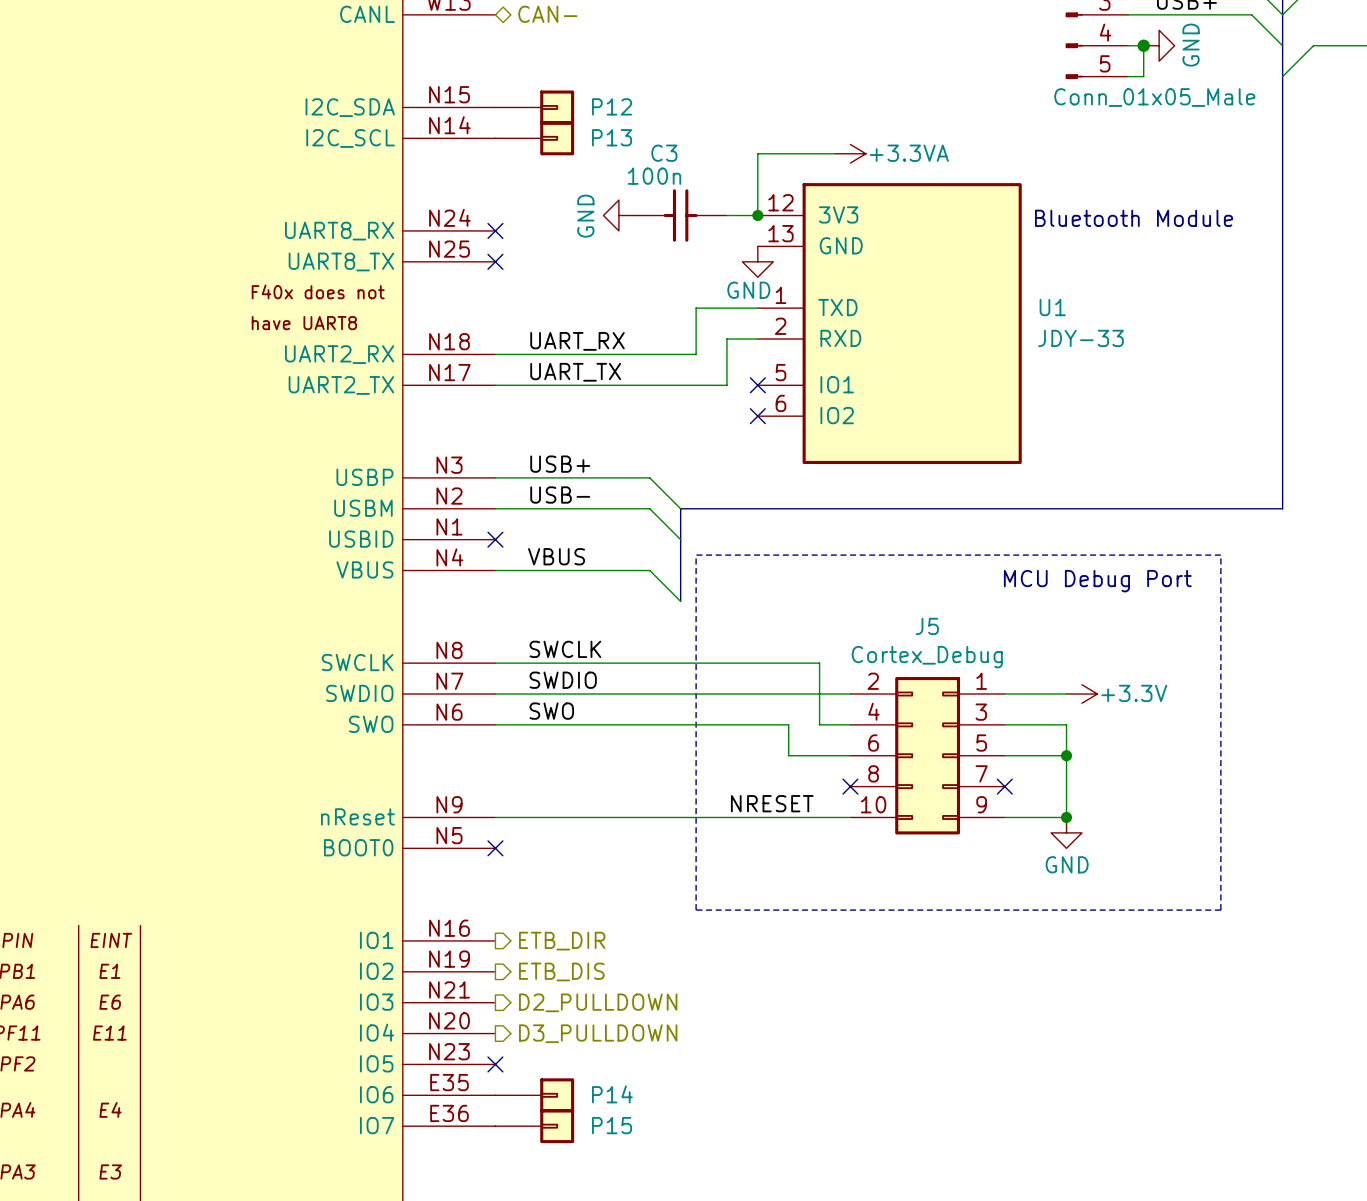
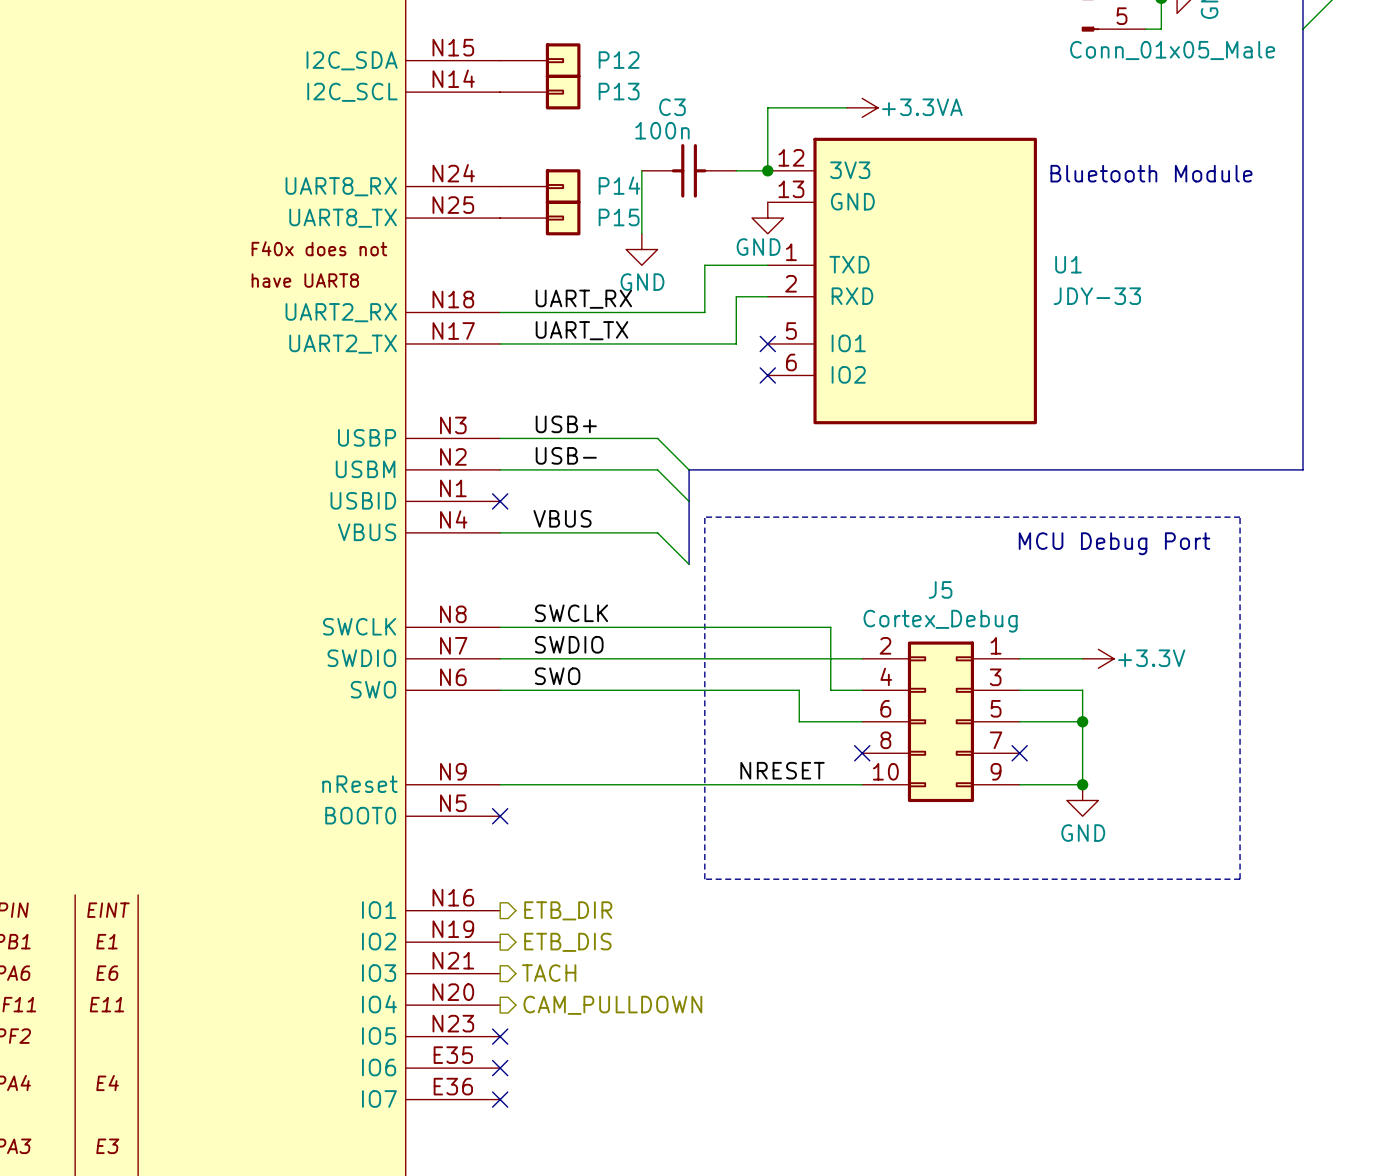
power symbol rotation: 0° (618, 215) -> 90° counterclockwise (641, 249)
power symbol position: GND (618, 215) -> GND (641, 249)
wire: none -> (641, 170) (641, 233)
no-connect mark: (495, 230) -> none
no-connect mark: (495, 261) -> none
hierarchical label: D2_PULLDOWN (598, 1002) -> TACH (549, 973)
hierarchical label: D3_PULLDOWN (598, 1033) -> CAM_PULLDOWN (612, 1005)
no-connect mark: none -> (500, 1068)
P14 position: (534, 1095) -> (540, 186)
no-connect mark: none -> (500, 1099)
P15 position: (534, 1126) -> (540, 218)

